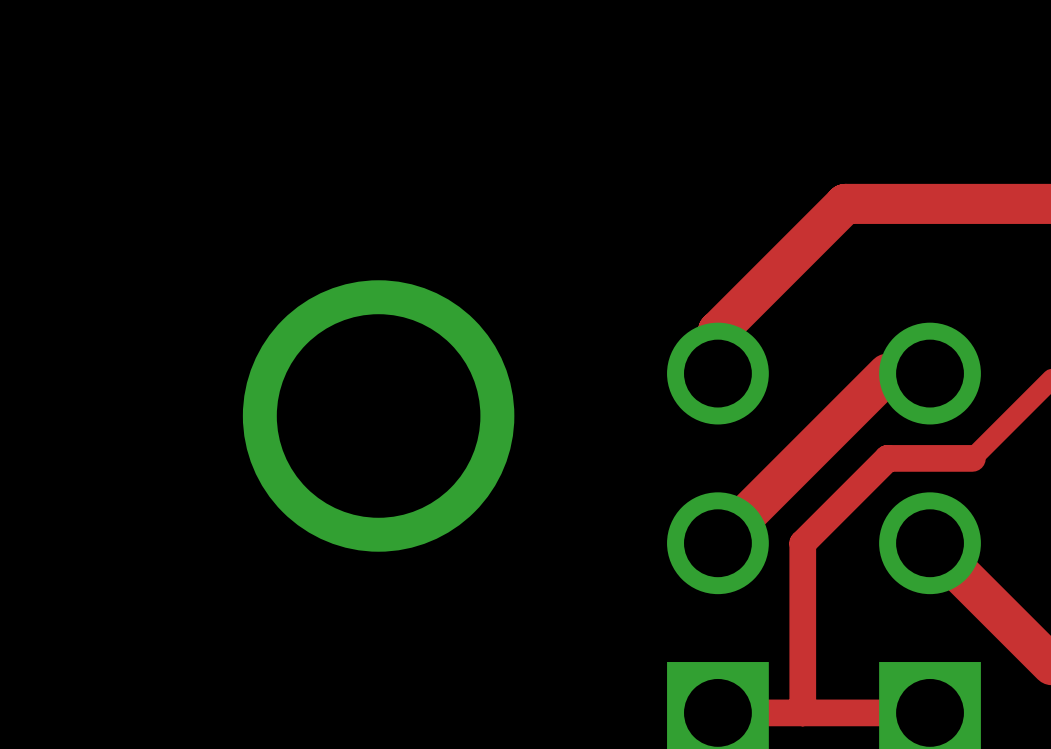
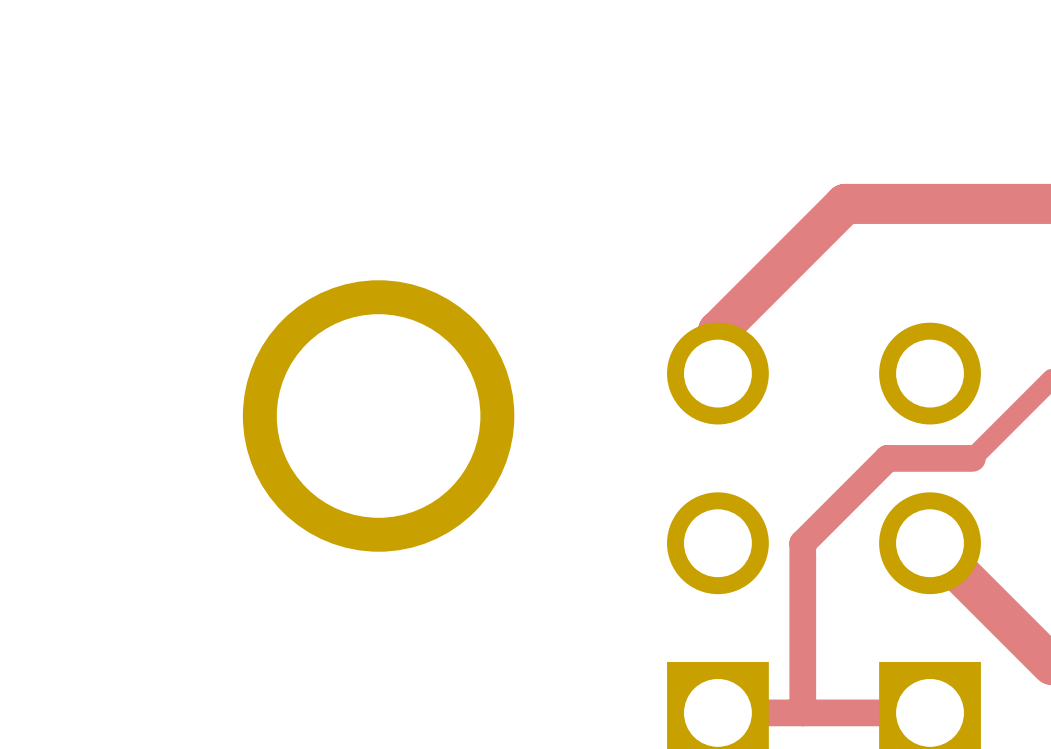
top track: (930, 373) (887, 373) (717, 543) -> none

